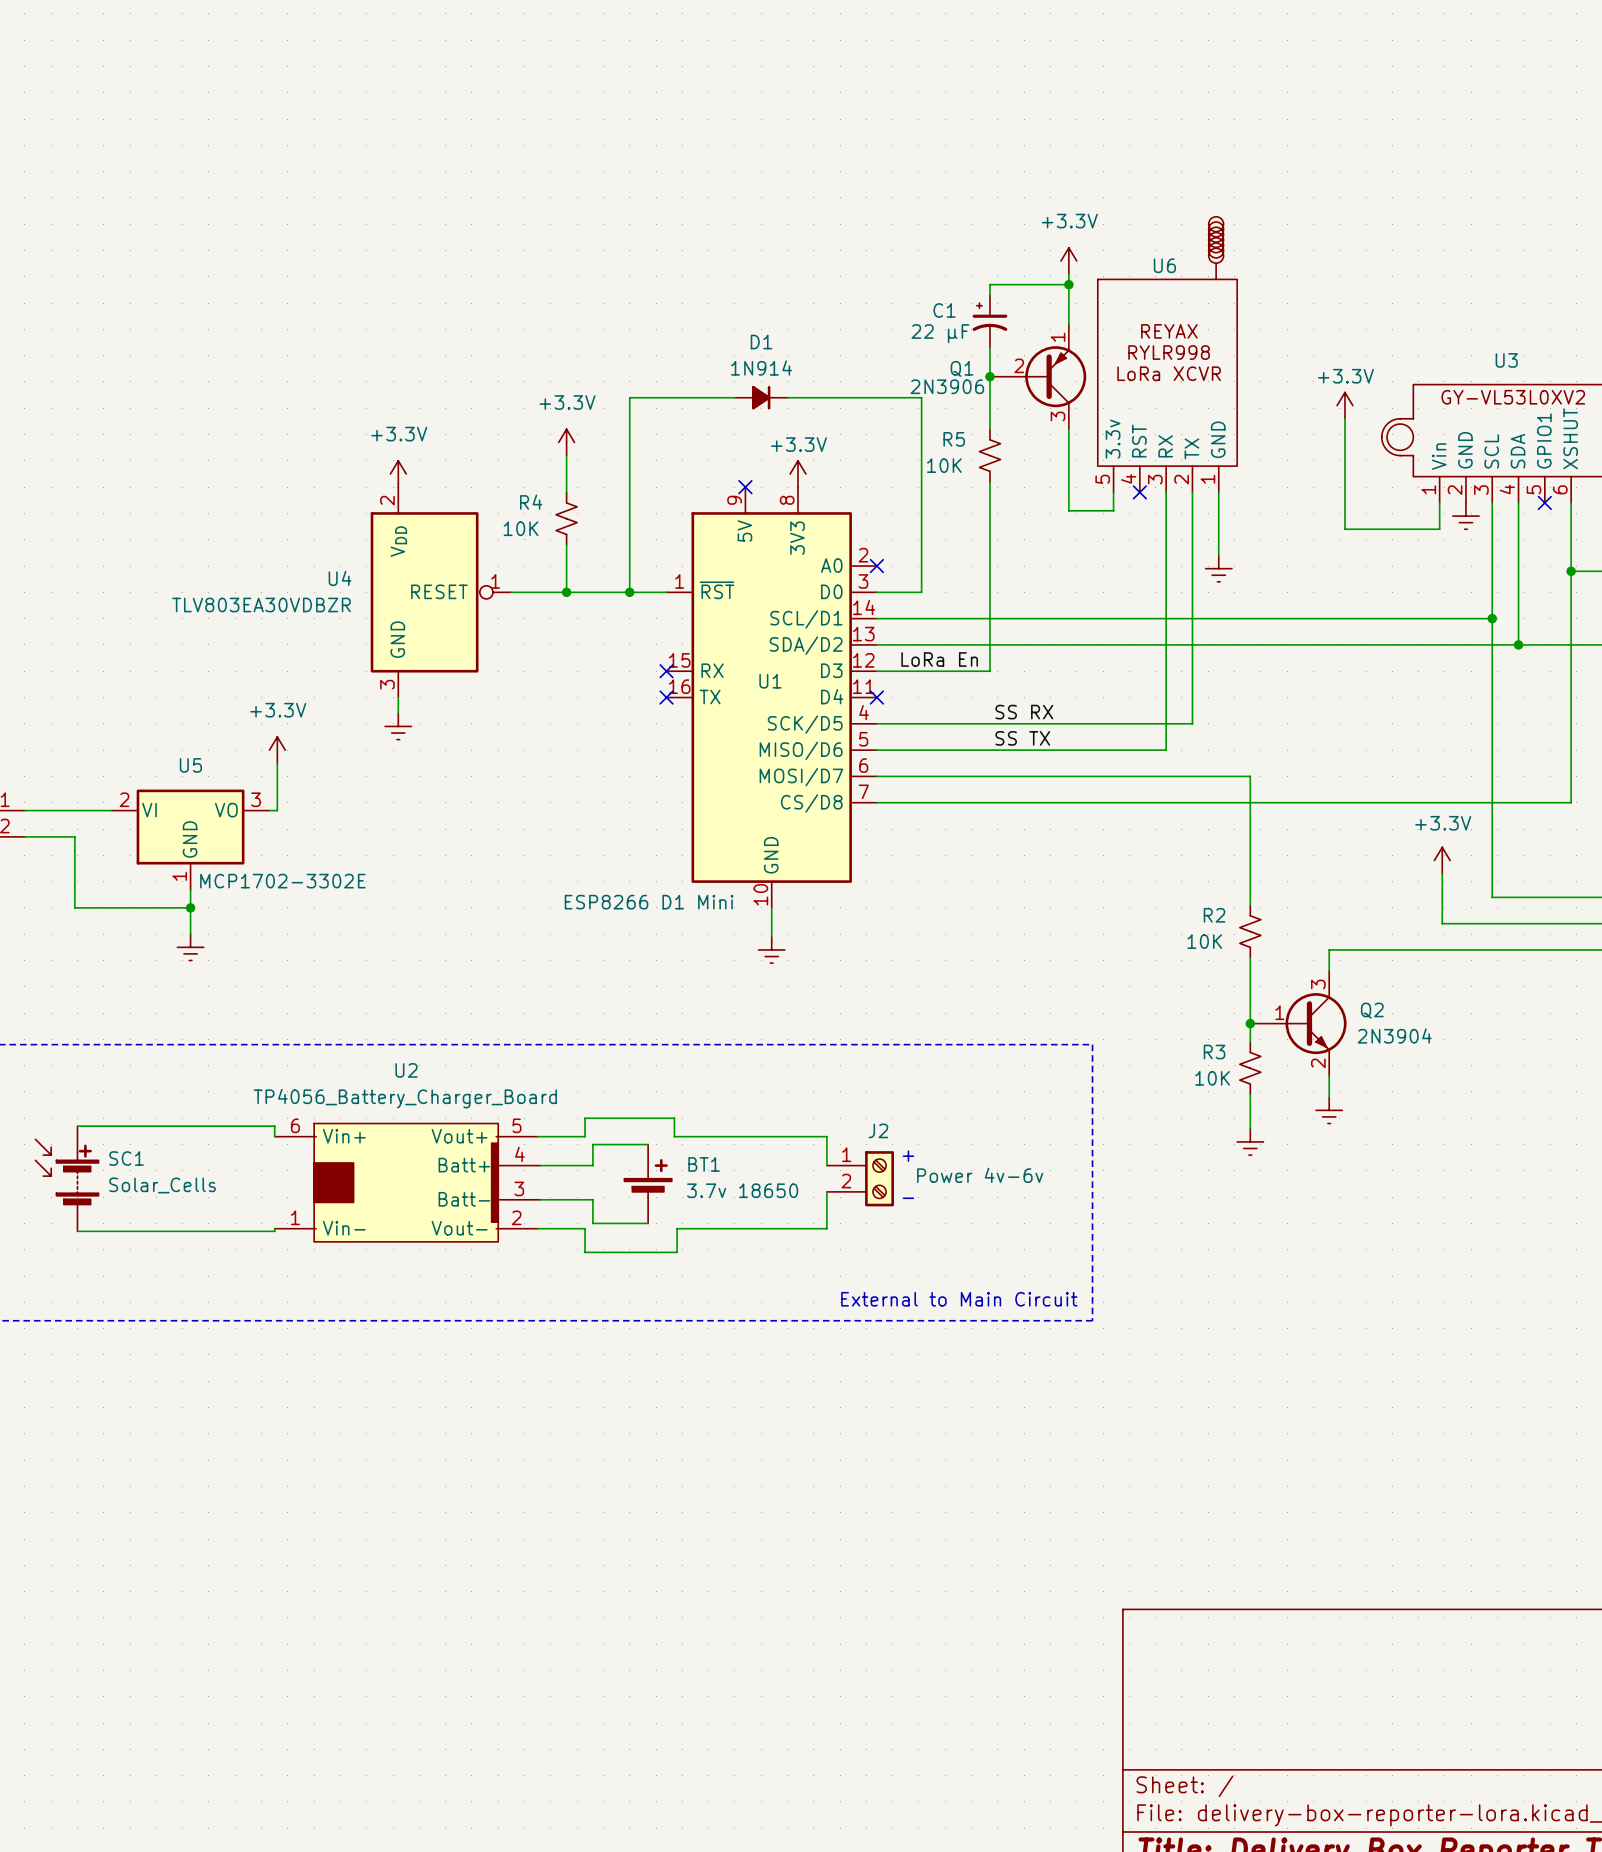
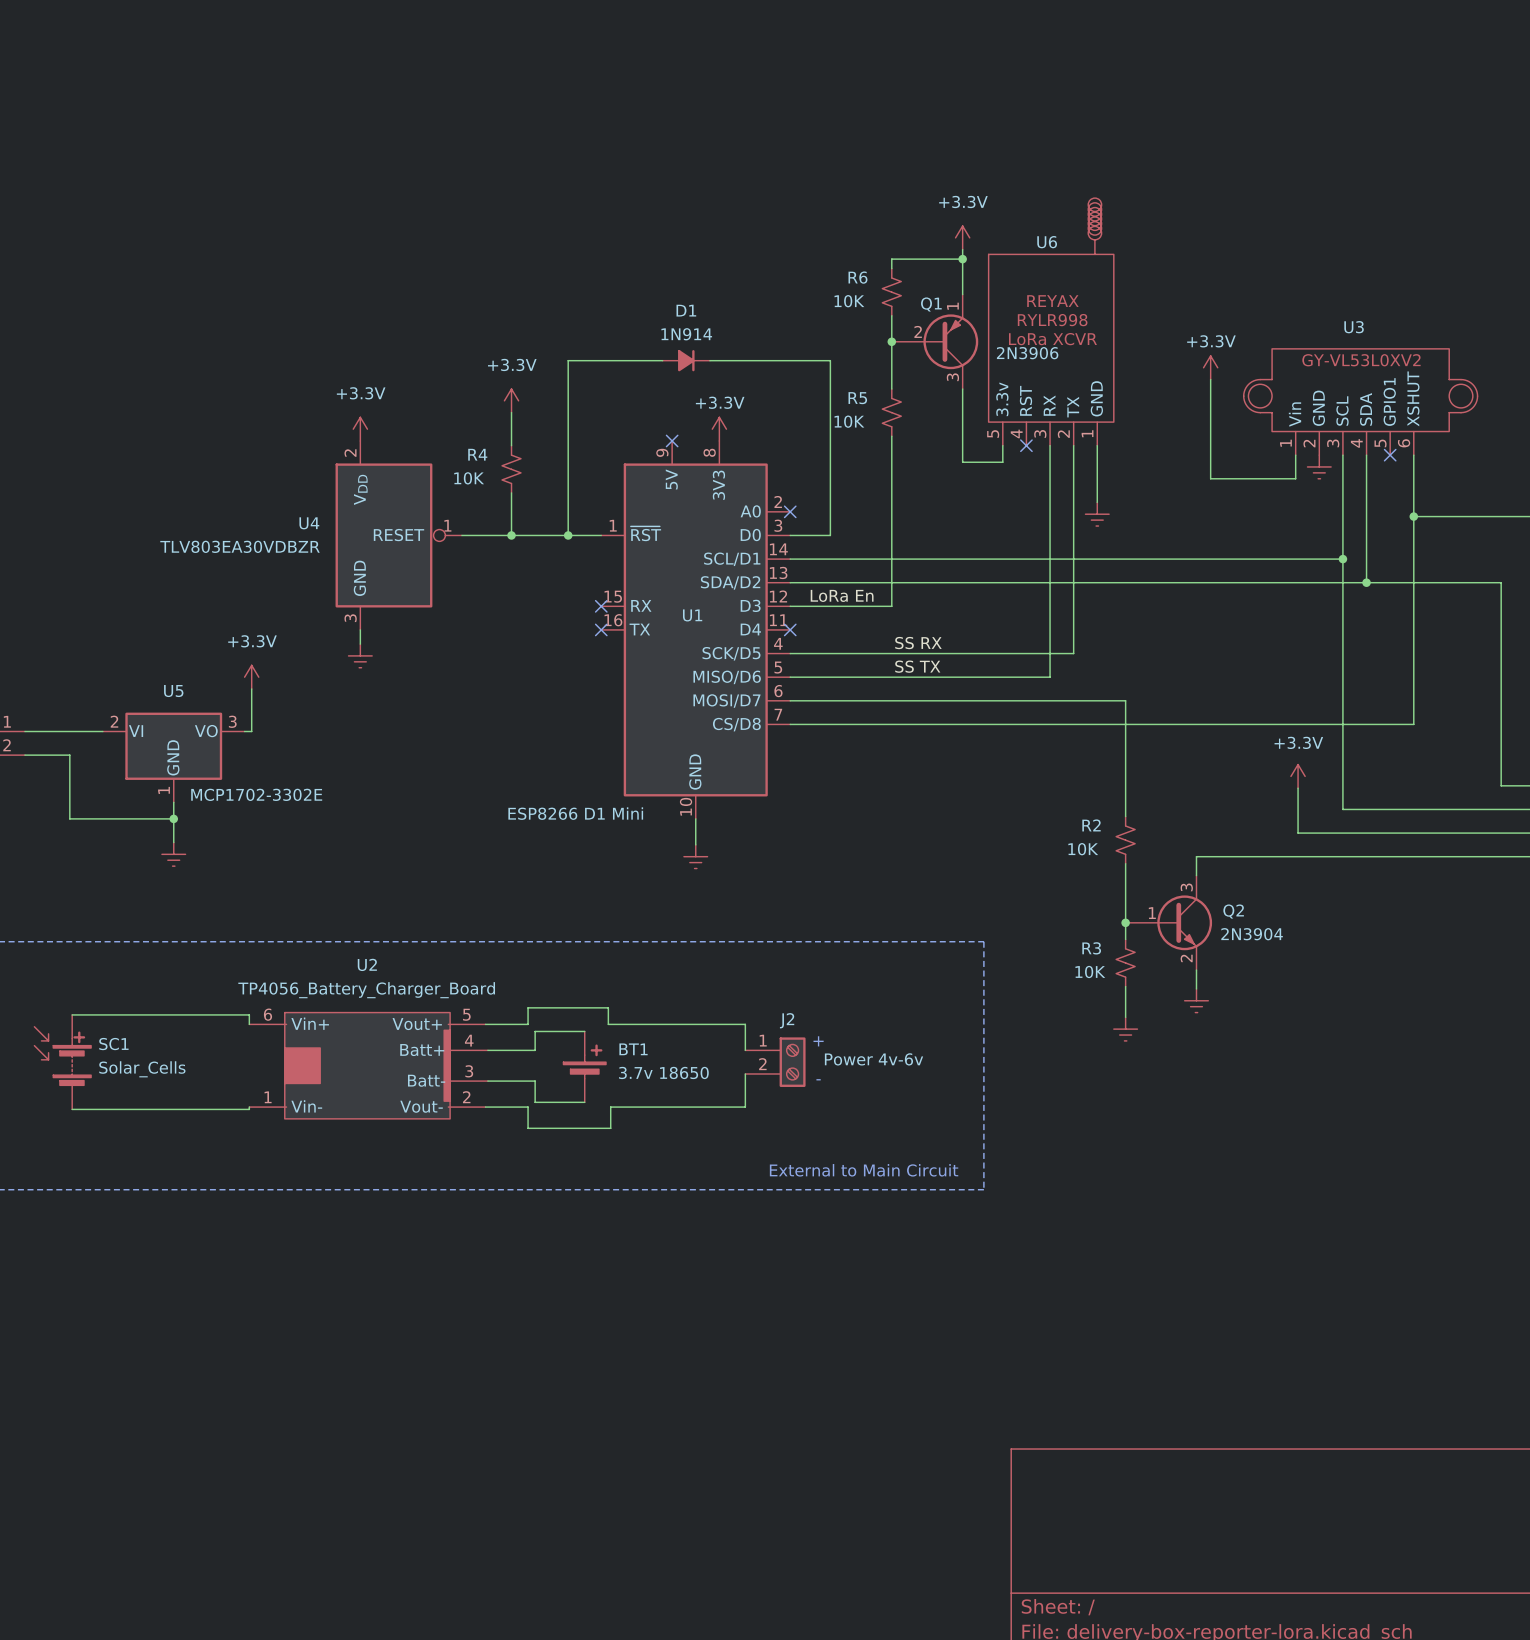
C1: 22 μF (989, 321) -> none
R6: none -> 10K (891, 292)
Q1 name position: Q1 (962, 368) -> Q1 (931, 304)
Q1 value position: 2N3906 (947, 386) -> 2N3906 (1027, 353)

